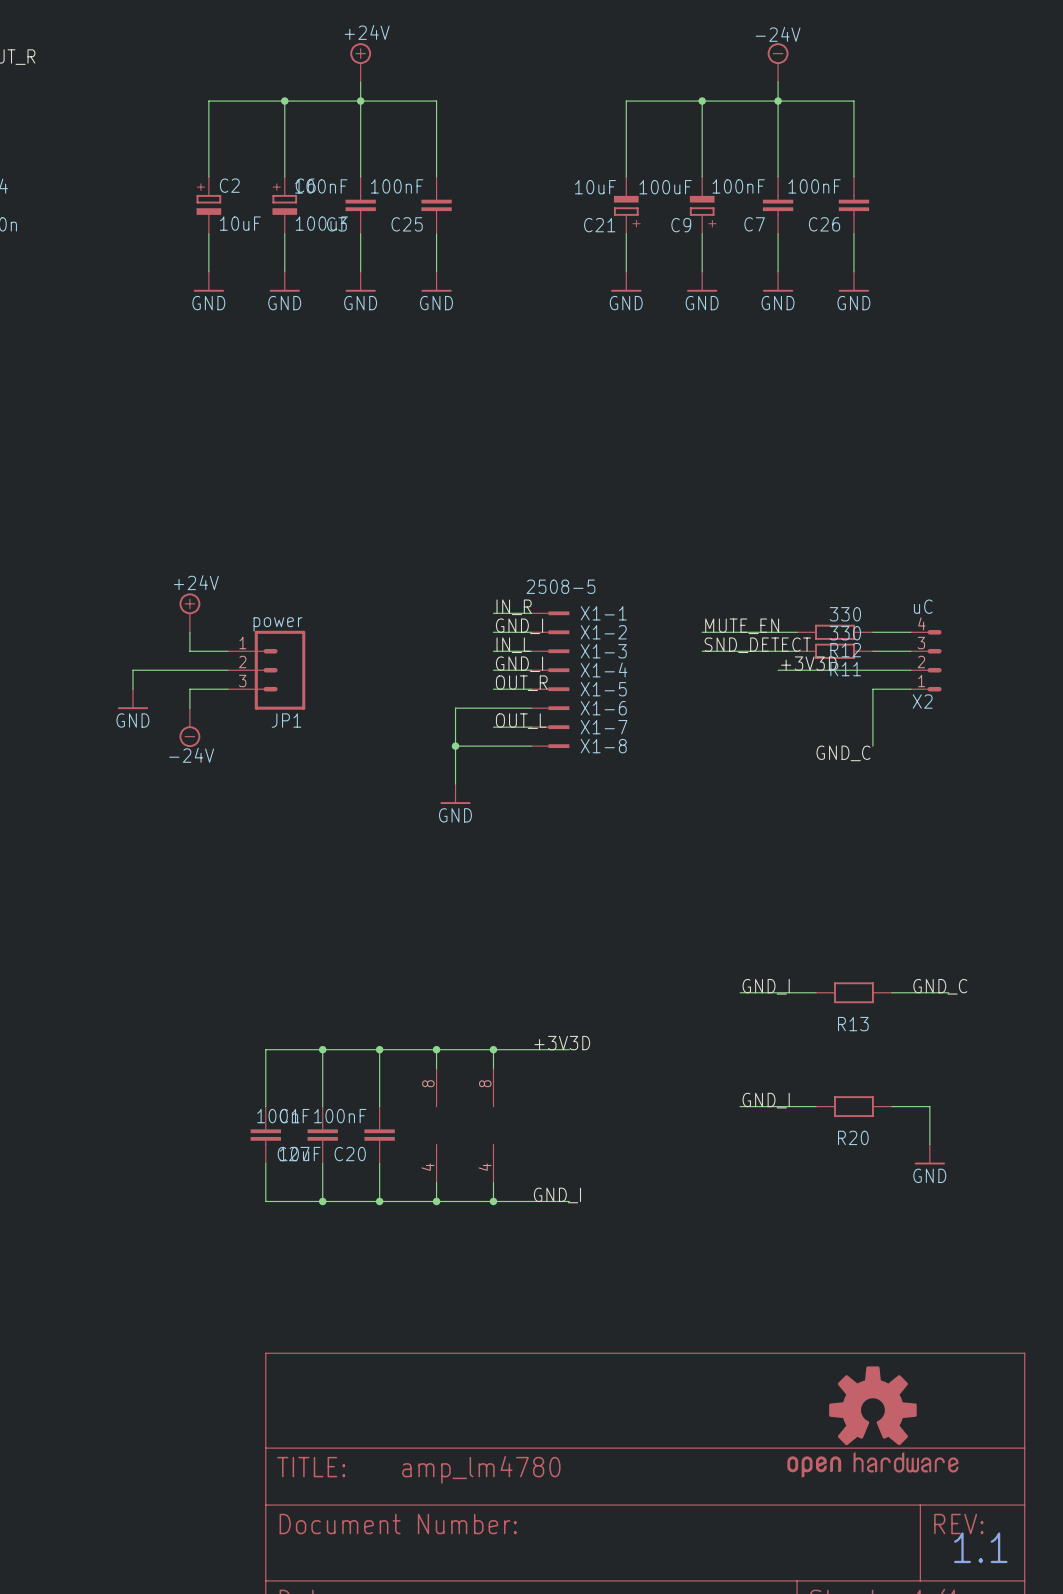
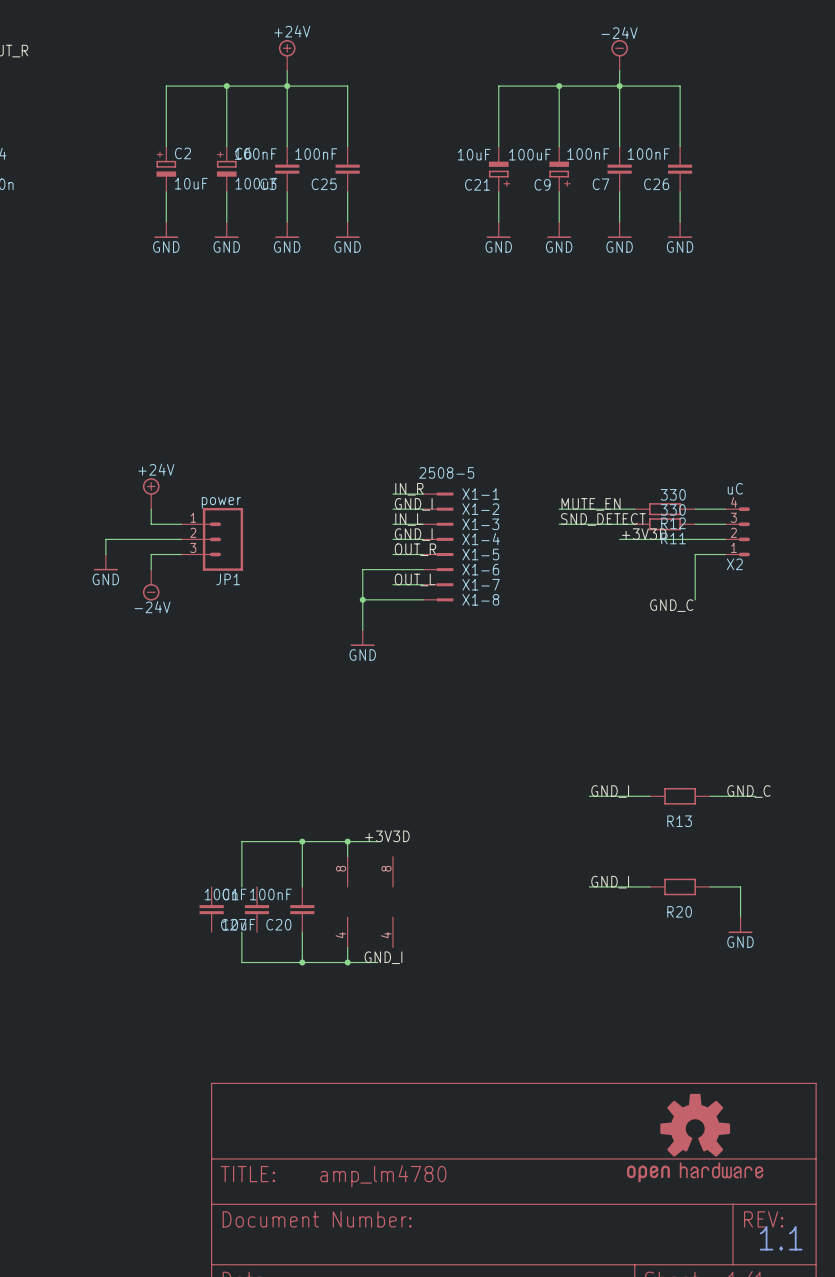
label position: +3V3D (562, 1043) -> +3V3D (387, 836)
wire: (303, 1049) (265, 1049) (265, 1106) -> (241, 841) (241, 886)
wire: (322, 1049) (322, 1106) -> none
junction: (322, 1049) -> none
wire: (474, 1049) (569, 1049) -> none
wire: (493, 1049) (493, 1068) -> none
junction: (493, 1049) -> none
wire: (265, 1163) (265, 1201) (303, 1201) -> (241, 932) (241, 962)
wire: (322, 1163) (322, 1201) -> none
wire: (493, 1182) (493, 1201) -> none
label position: GND_I (557, 1195) -> GND_I (383, 957)
junction: (322, 1201) -> none
wire: (474, 1201) (569, 1201) -> none
junction: (493, 1201) -> none

